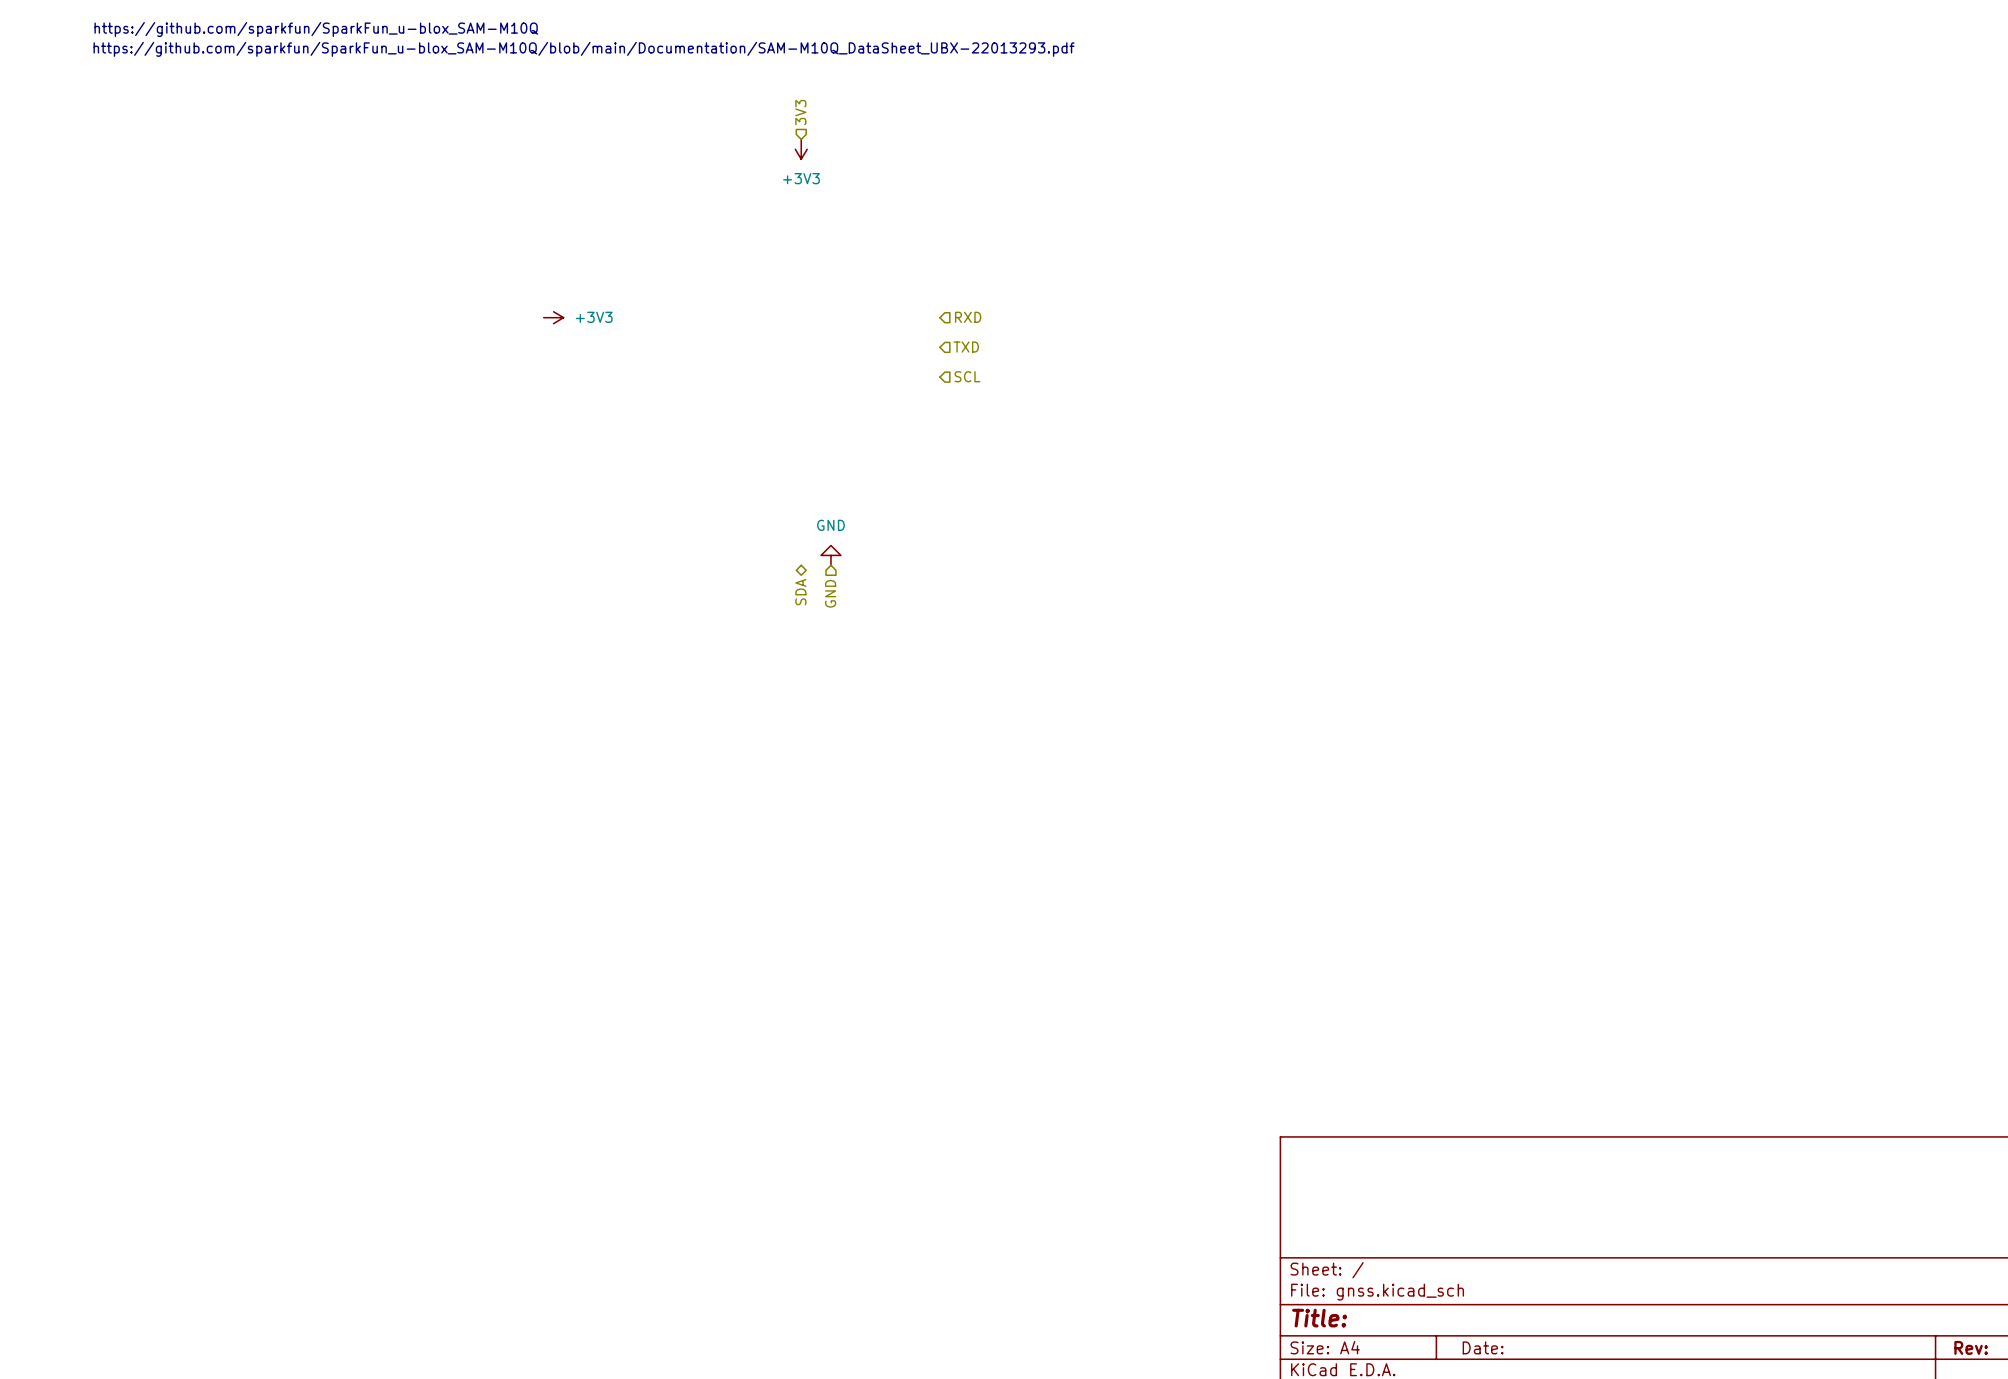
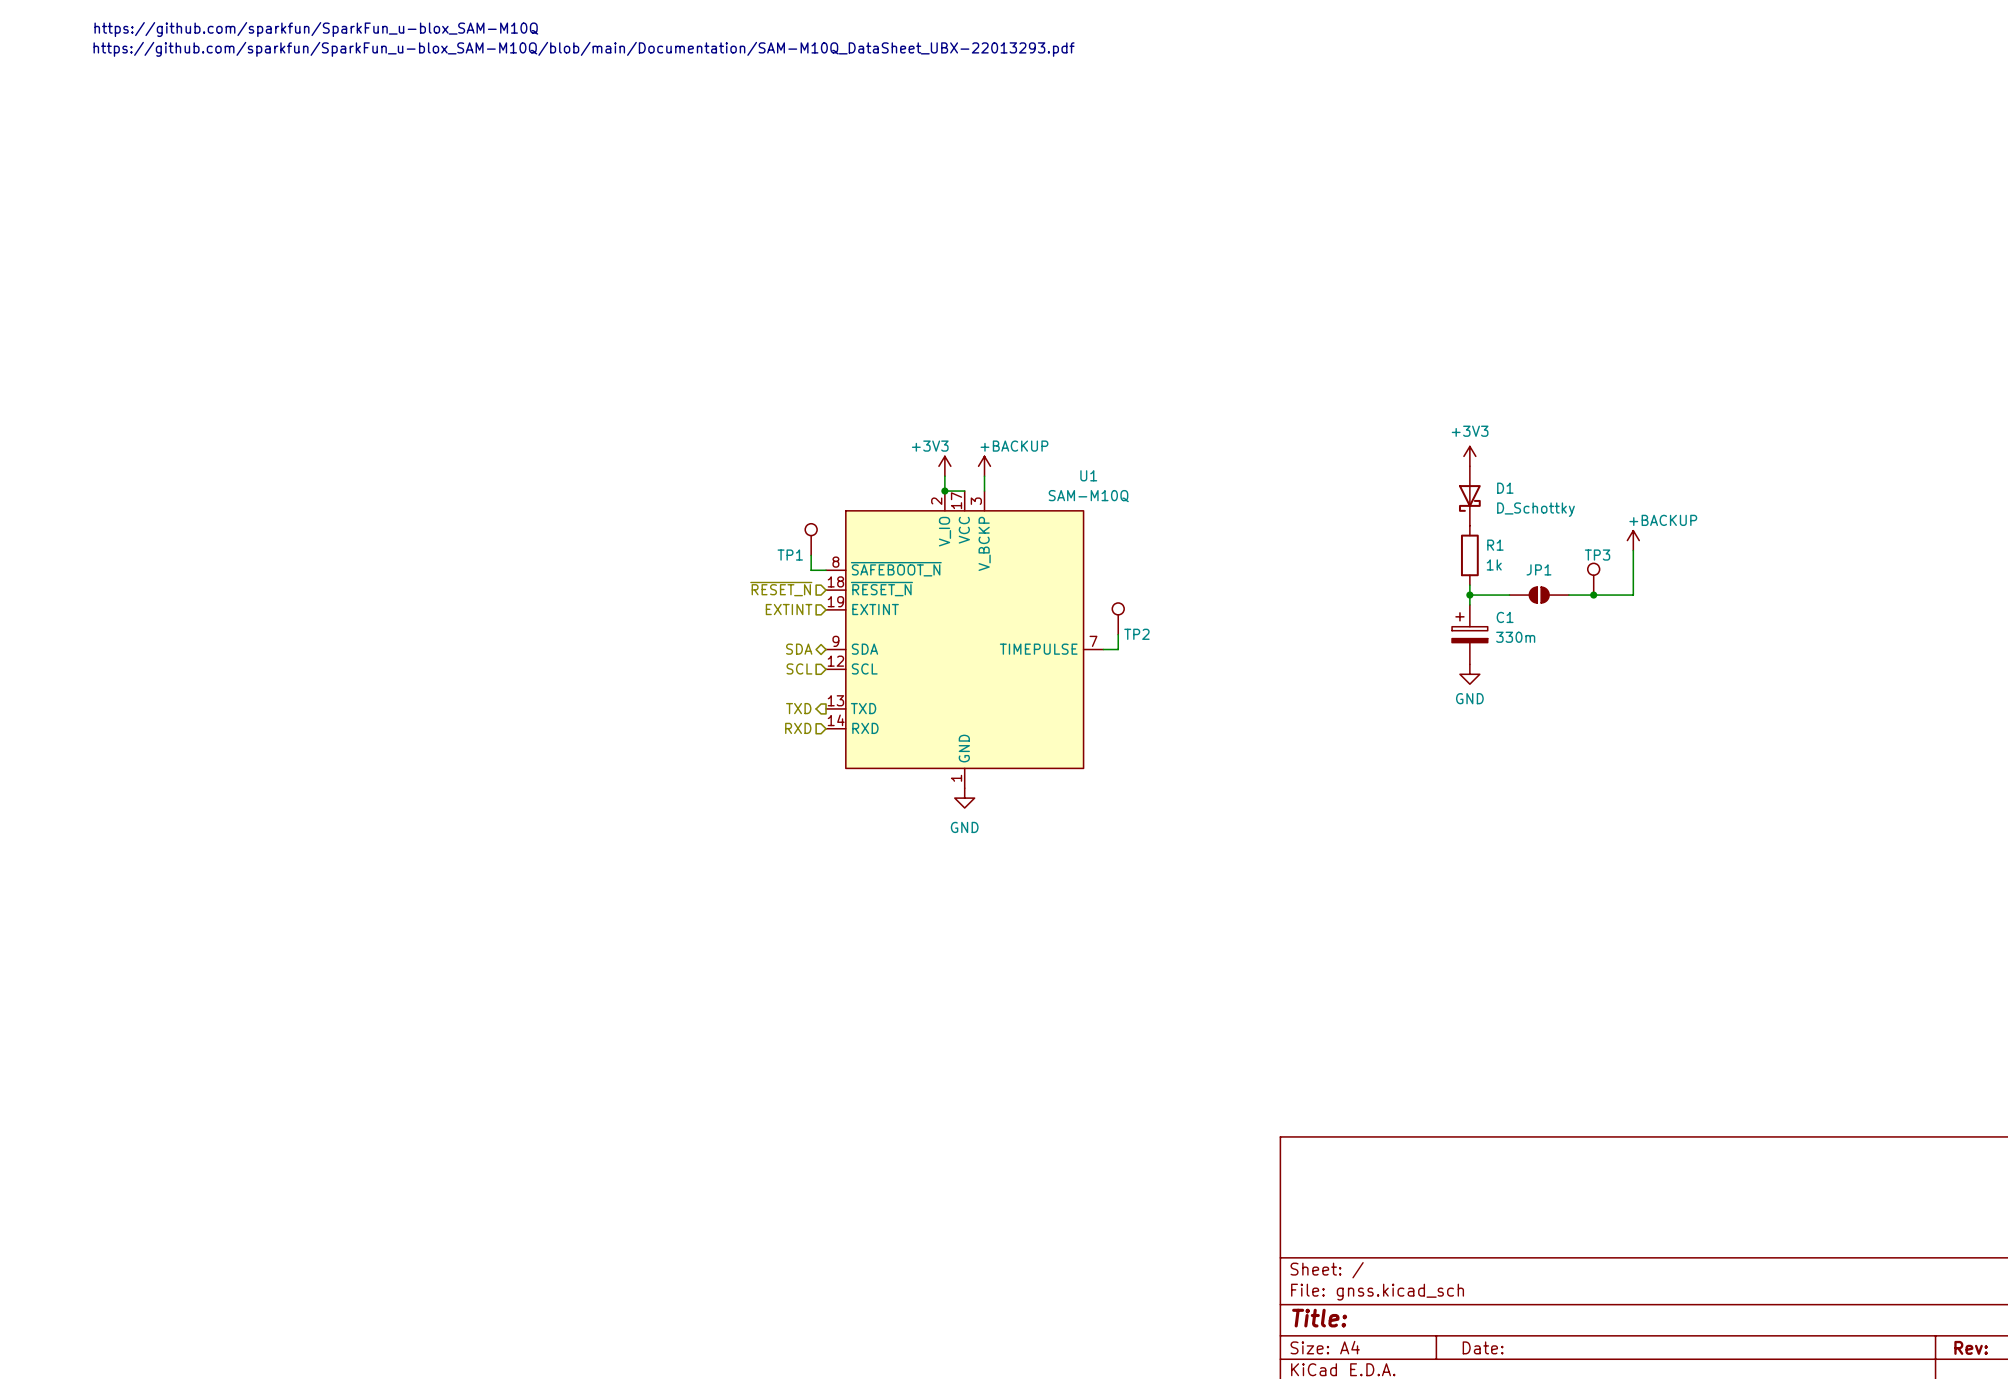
hierarchical label: 3V3 (800, 112) -> none
power symbol: +3V3 (801, 149) -> none
power symbol: +3V3 (553, 317) -> none
hierarchical label: RXD (968, 317) -> none
hierarchical label: TXD (966, 347) -> none
hierarchical label: SCL (967, 376) -> none
power symbol: none -> +3V3 (1469, 456)
power symbol: none -> +3V3 (944, 466)
power symbol: none -> +BACKUP (984, 466)
wire: none -> (944, 476) (944, 491) (964, 491)
wire: none -> (984, 476) (984, 491)
junction: none -> (944, 491)
D1: none -> D_Schottky (1469, 495)
TP1: none -> (811, 539)
power symbol: none -> +BACKUP (1633, 540)
wire: none -> (1633, 550) (1633, 595) (1568, 595)
wire: none -> (811, 555) (811, 570) (826, 570)
power symbol: GND (830, 555) -> none
R1: none -> 1k (1469, 555)
TP3: none -> (1593, 579)
wire: none -> (1469, 585) (1469, 604)
hierarchical label: none -> ~{RESET_N} (781, 589)
hierarchical label rotation: 0° (800, 592) -> 90° clockwise (799, 649)
hierarchical label position: SDA (800, 592) -> SDA (799, 649)
hierarchical label: GND (830, 593) -> none
wire: none -> (1469, 595) (1509, 595)
junction: none -> (1469, 595)
JP1: none -> (1539, 595)
junction: none -> (1593, 595)
hierarchical label: none -> EXTINT (789, 609)
TP2: none -> (1118, 618)
wire: none -> (1118, 634) (1118, 649) (1103, 649)
C1: none -> 330m (1469, 634)
U1: none -> SAM-M10Q (964, 639)
hierarchical label: none -> SCL (799, 668)
power symbol: none -> GND (1469, 674)
hierarchical label: none -> TXD (798, 708)
hierarchical label: none -> RXD (798, 728)
power symbol: none -> GND (964, 798)

